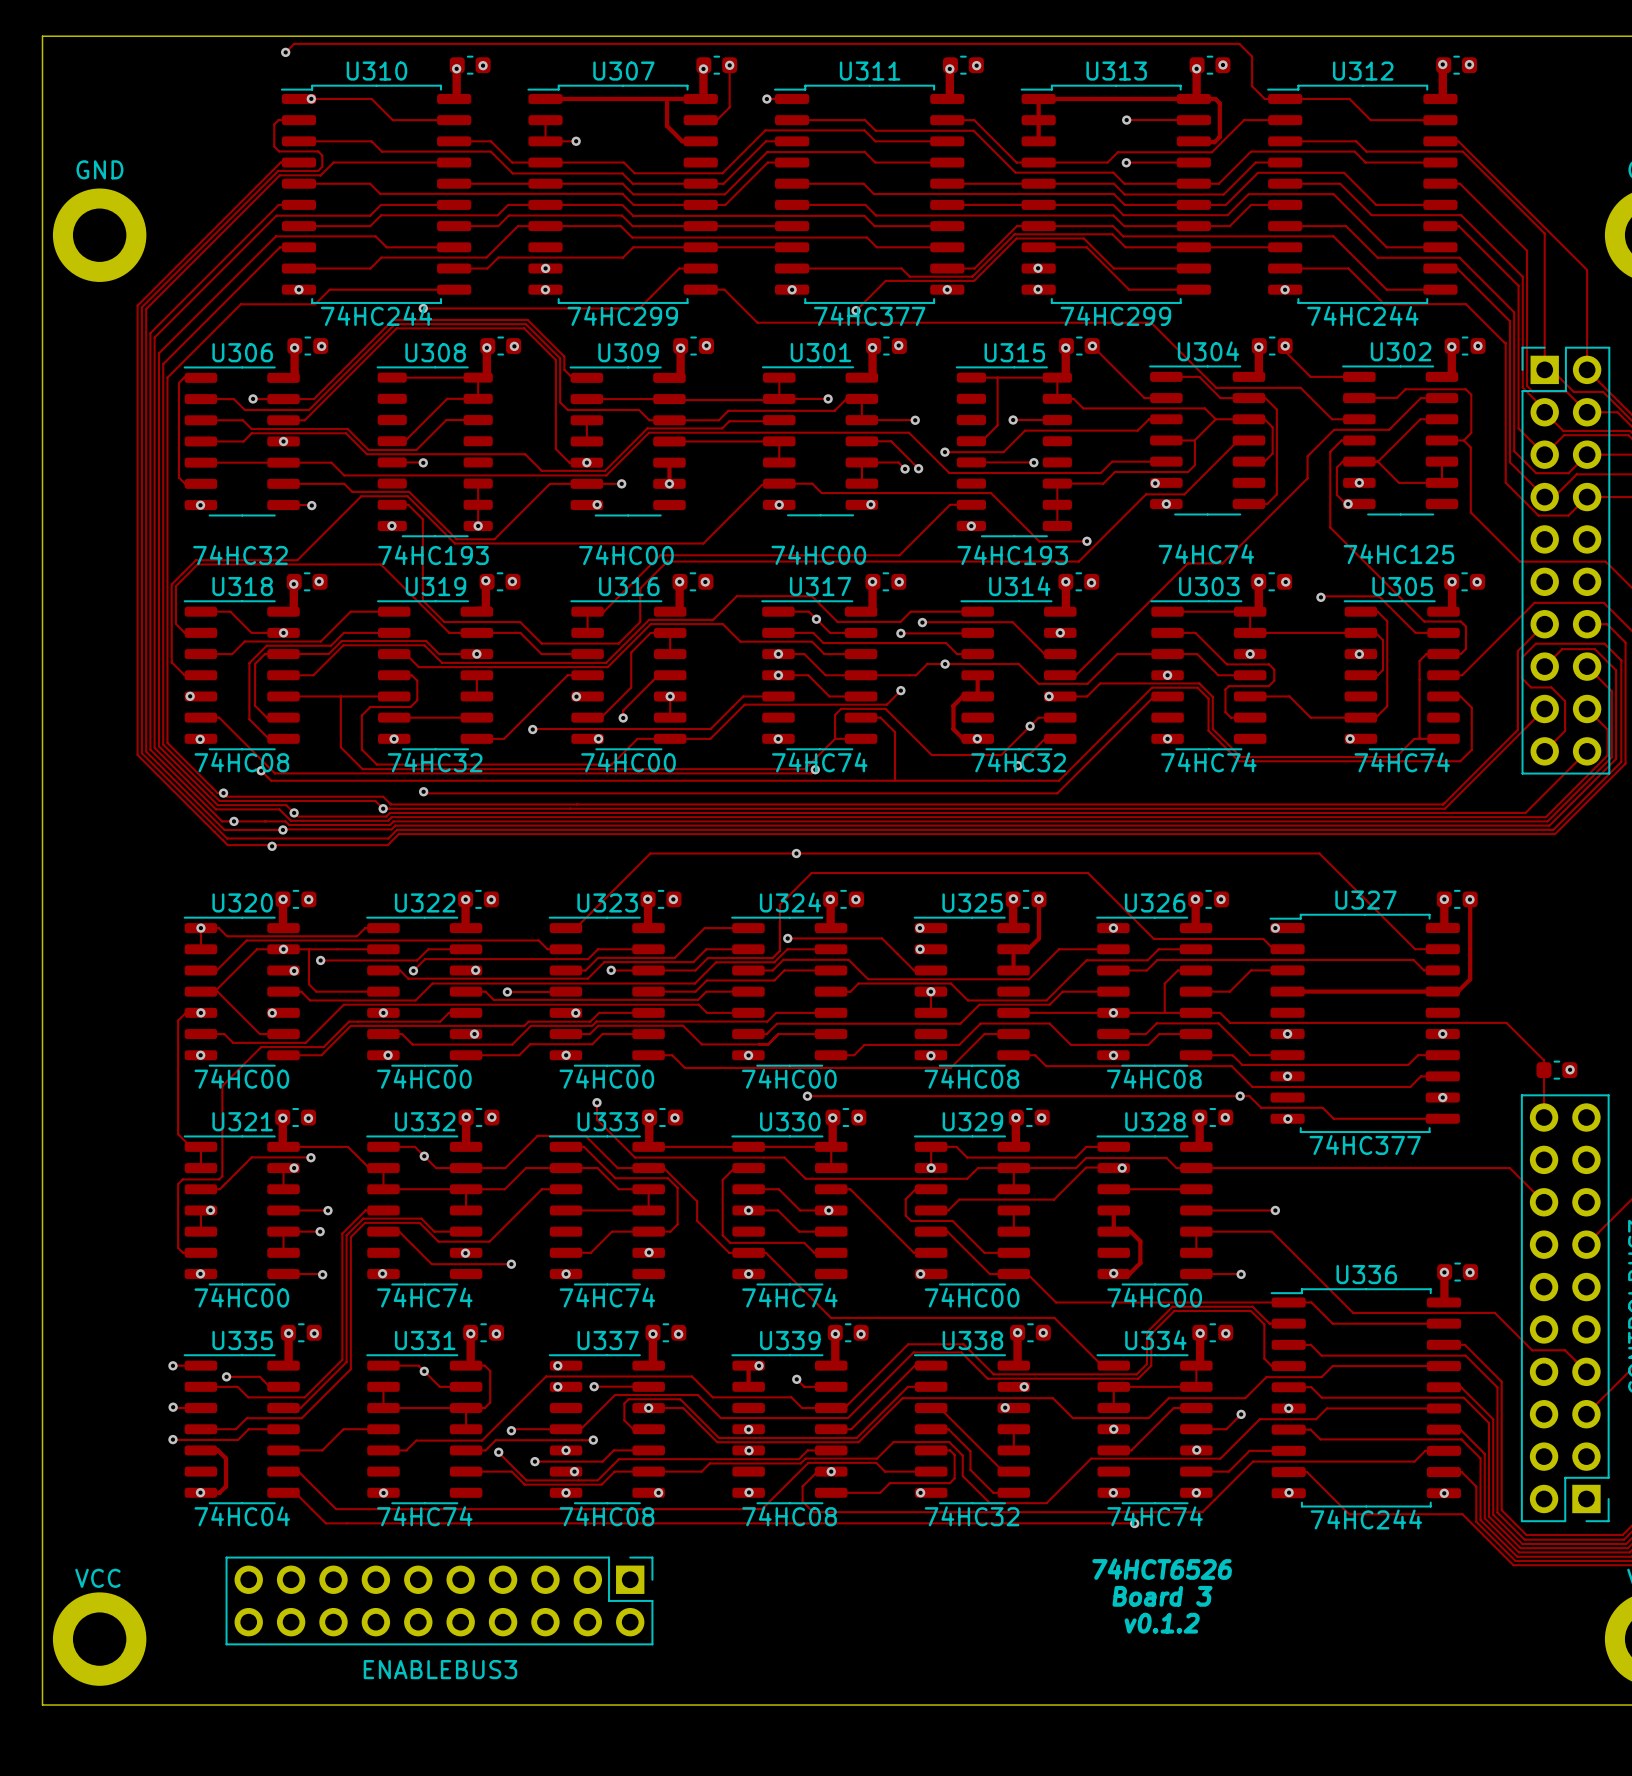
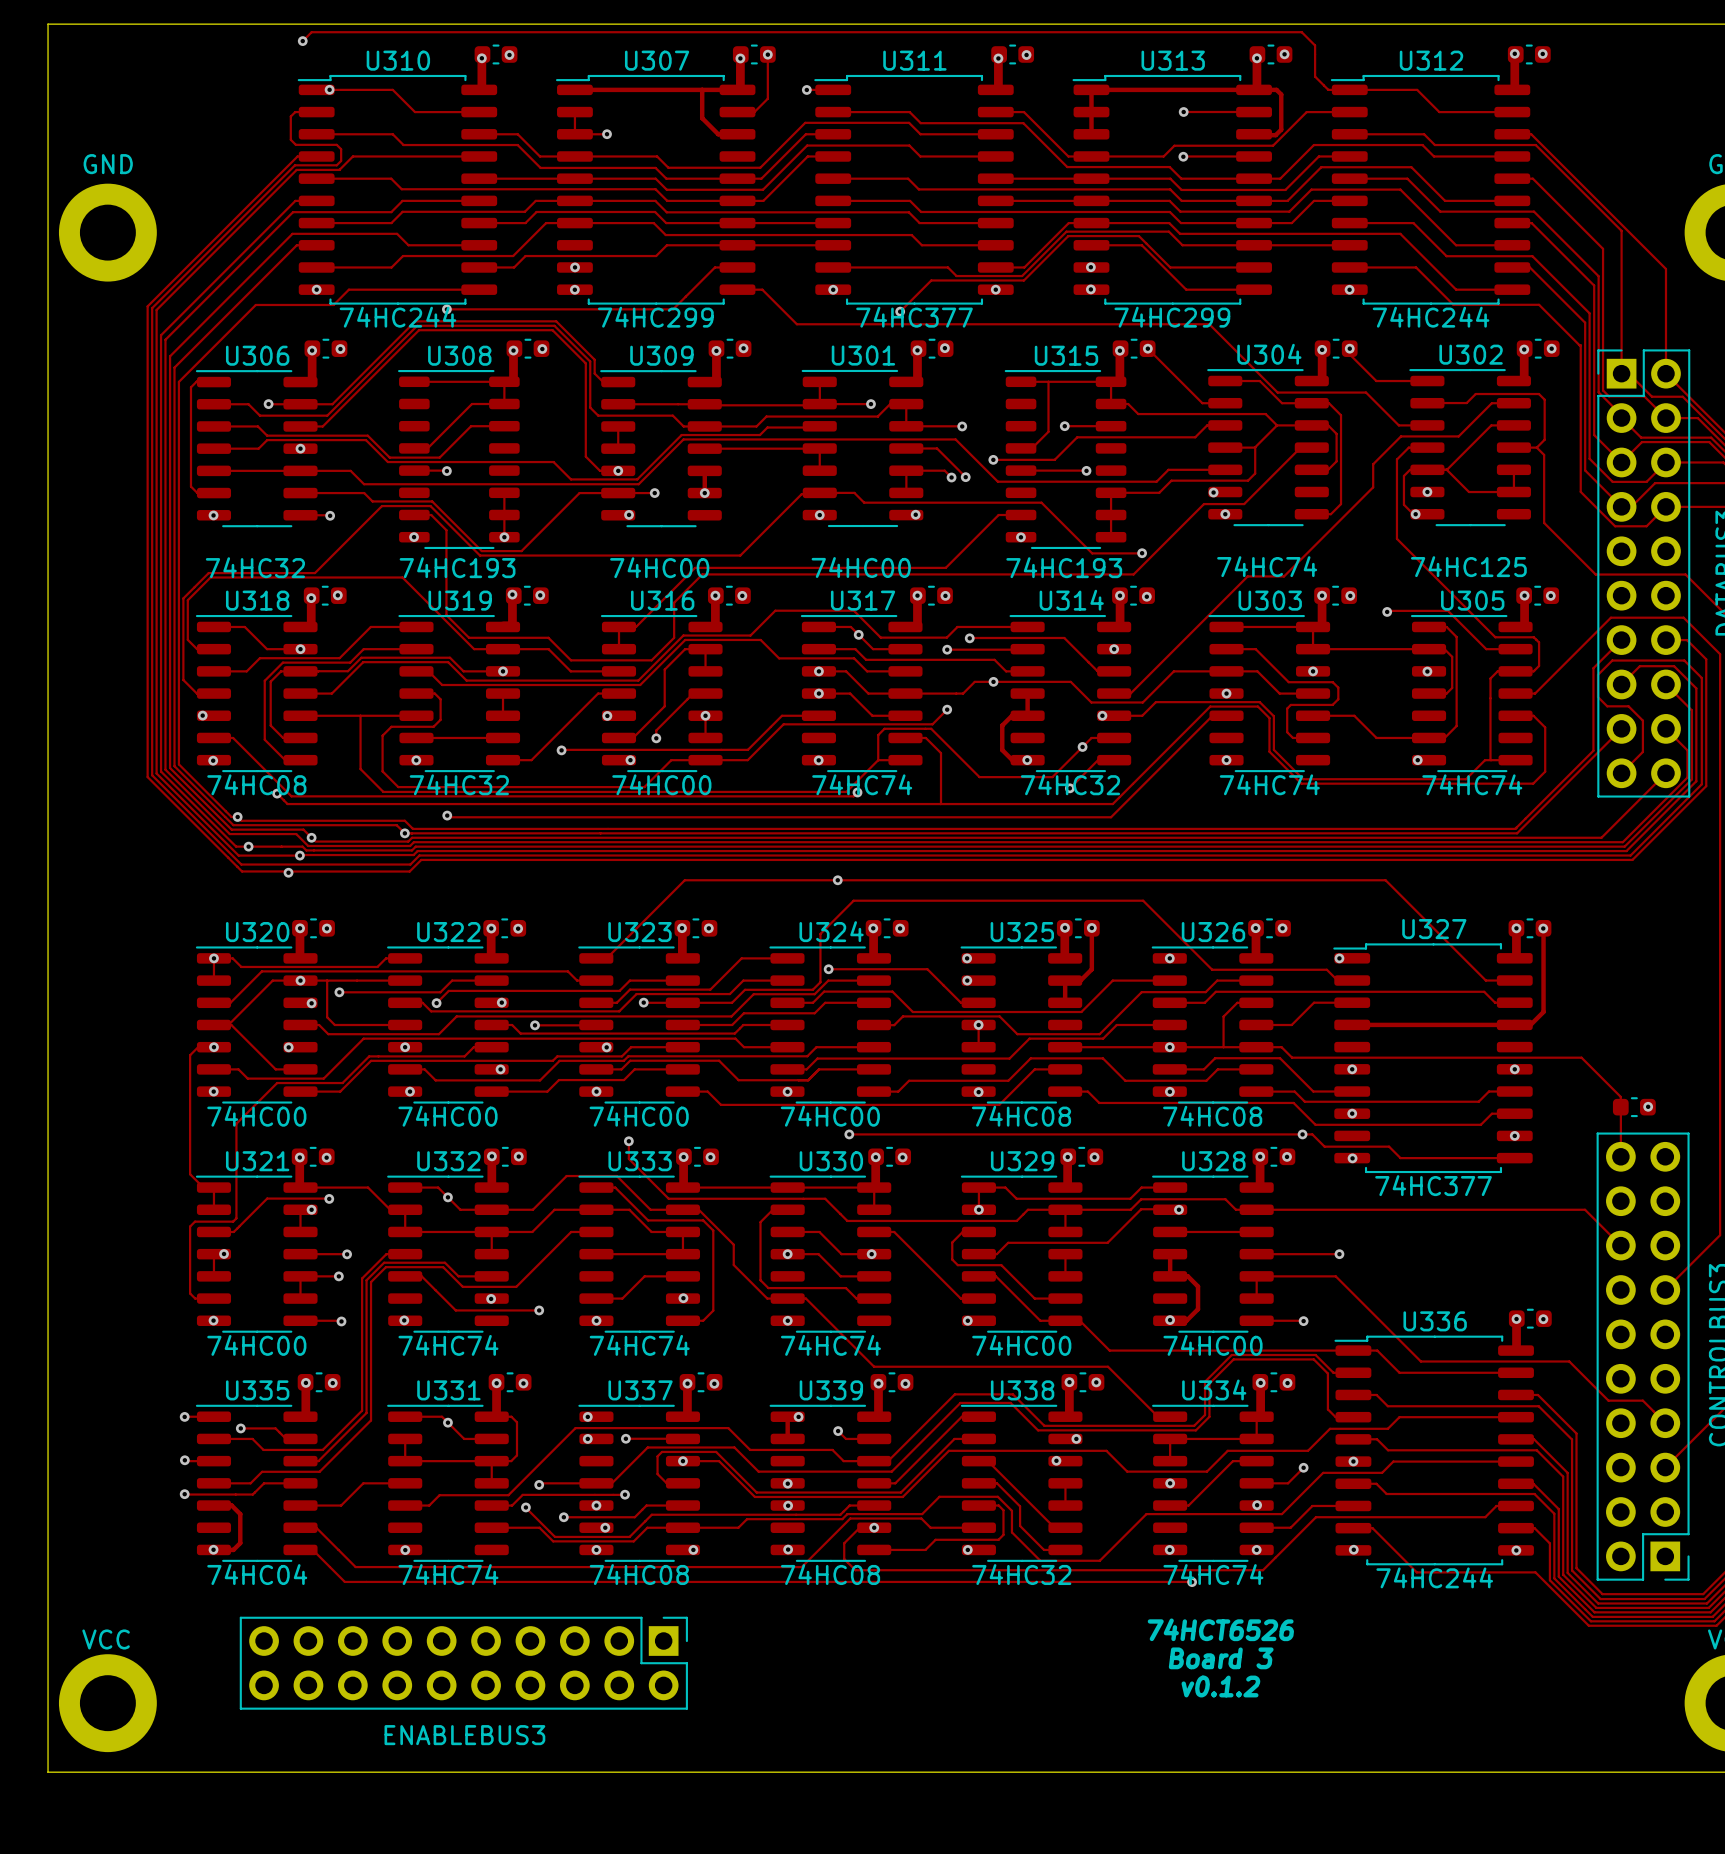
track: (677, 1224) (670, 1231) (648, 1231) -> (713, 1268) (713, 1310) (703, 1320) (682, 1320)

